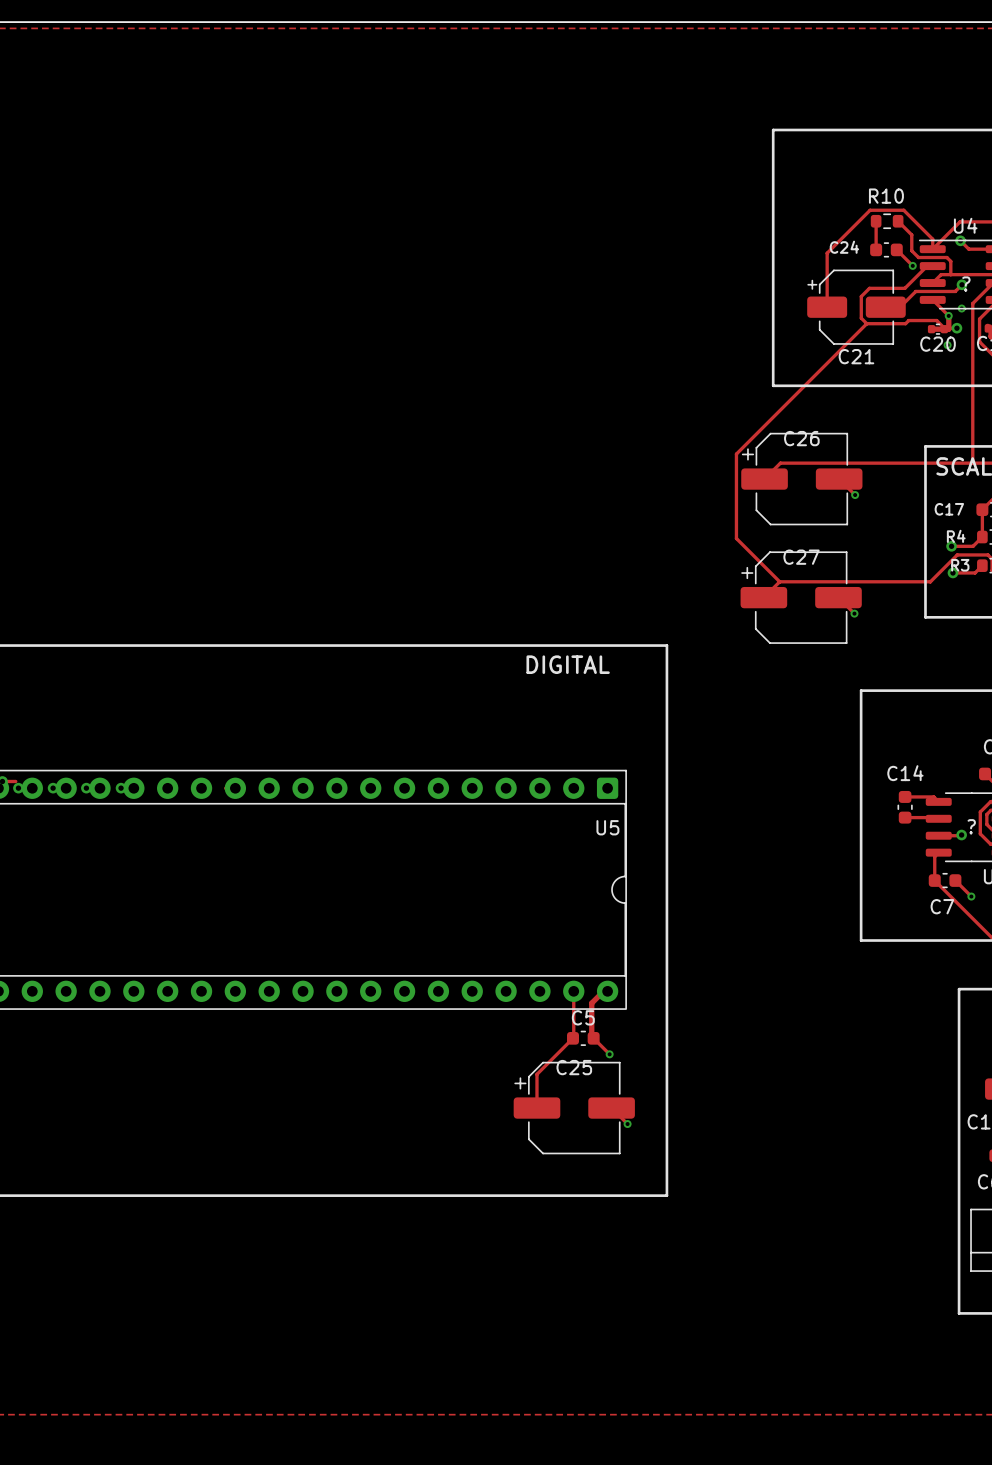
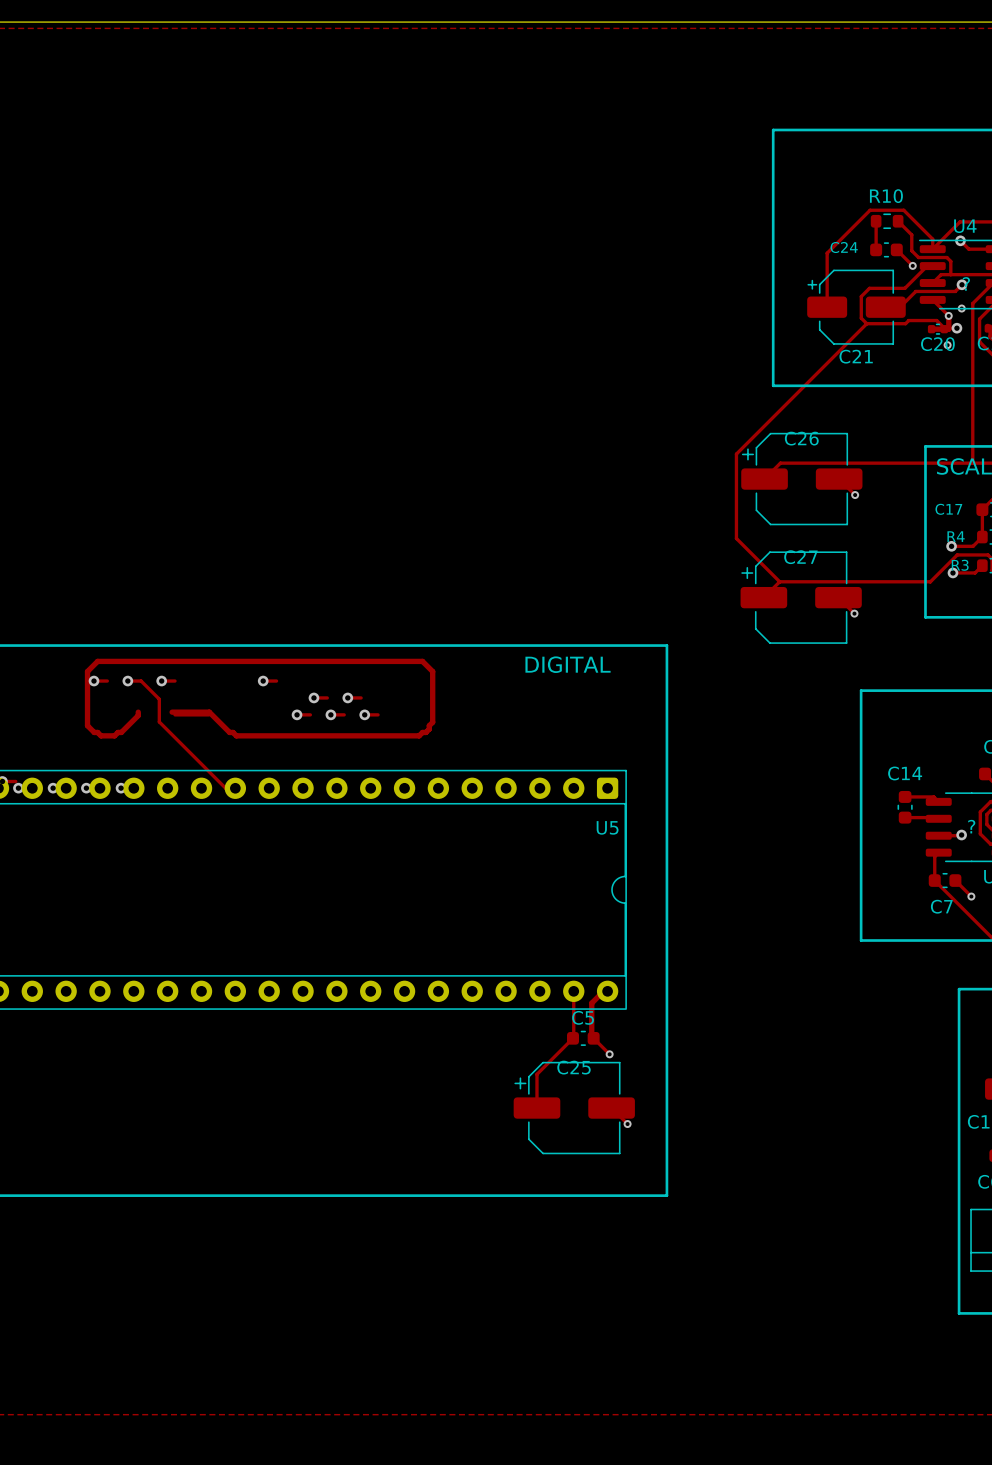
track: none -> (93, 681) (107, 681)
via: none -> (93, 681)
track: none -> (127, 681) (141, 681) (159, 699) (159, 721) (225, 788)
via: none -> (127, 681)
track: none -> (161, 681) (175, 681)
via: none -> (161, 681)
track: none -> (263, 681) (276, 681)
via: none -> (263, 681)
track: none -> (313, 697) (327, 697)
via: none -> (313, 697)
track: none -> (347, 697) (361, 697)
via: none -> (347, 697)
track: none -> (138, 712) (138, 715) (121, 732) (117, 732) (114, 735) (101, 735) (97, 732) (94, 732) (87, 725) (87, 671) (97, 661) (422, 661) (432, 671) (432, 722) (425, 732) (422, 732) (419, 735) (236, 735) (233, 732) (229, 732) (209, 712) (172, 712)
track: none -> (175, 714) (208, 714)
track: none -> (297, 714) (310, 714)
via: none -> (297, 714)
track: none -> (330, 714) (344, 714)
via: none -> (330, 714)
track: none -> (364, 714) (378, 714)
via: none -> (364, 714)

